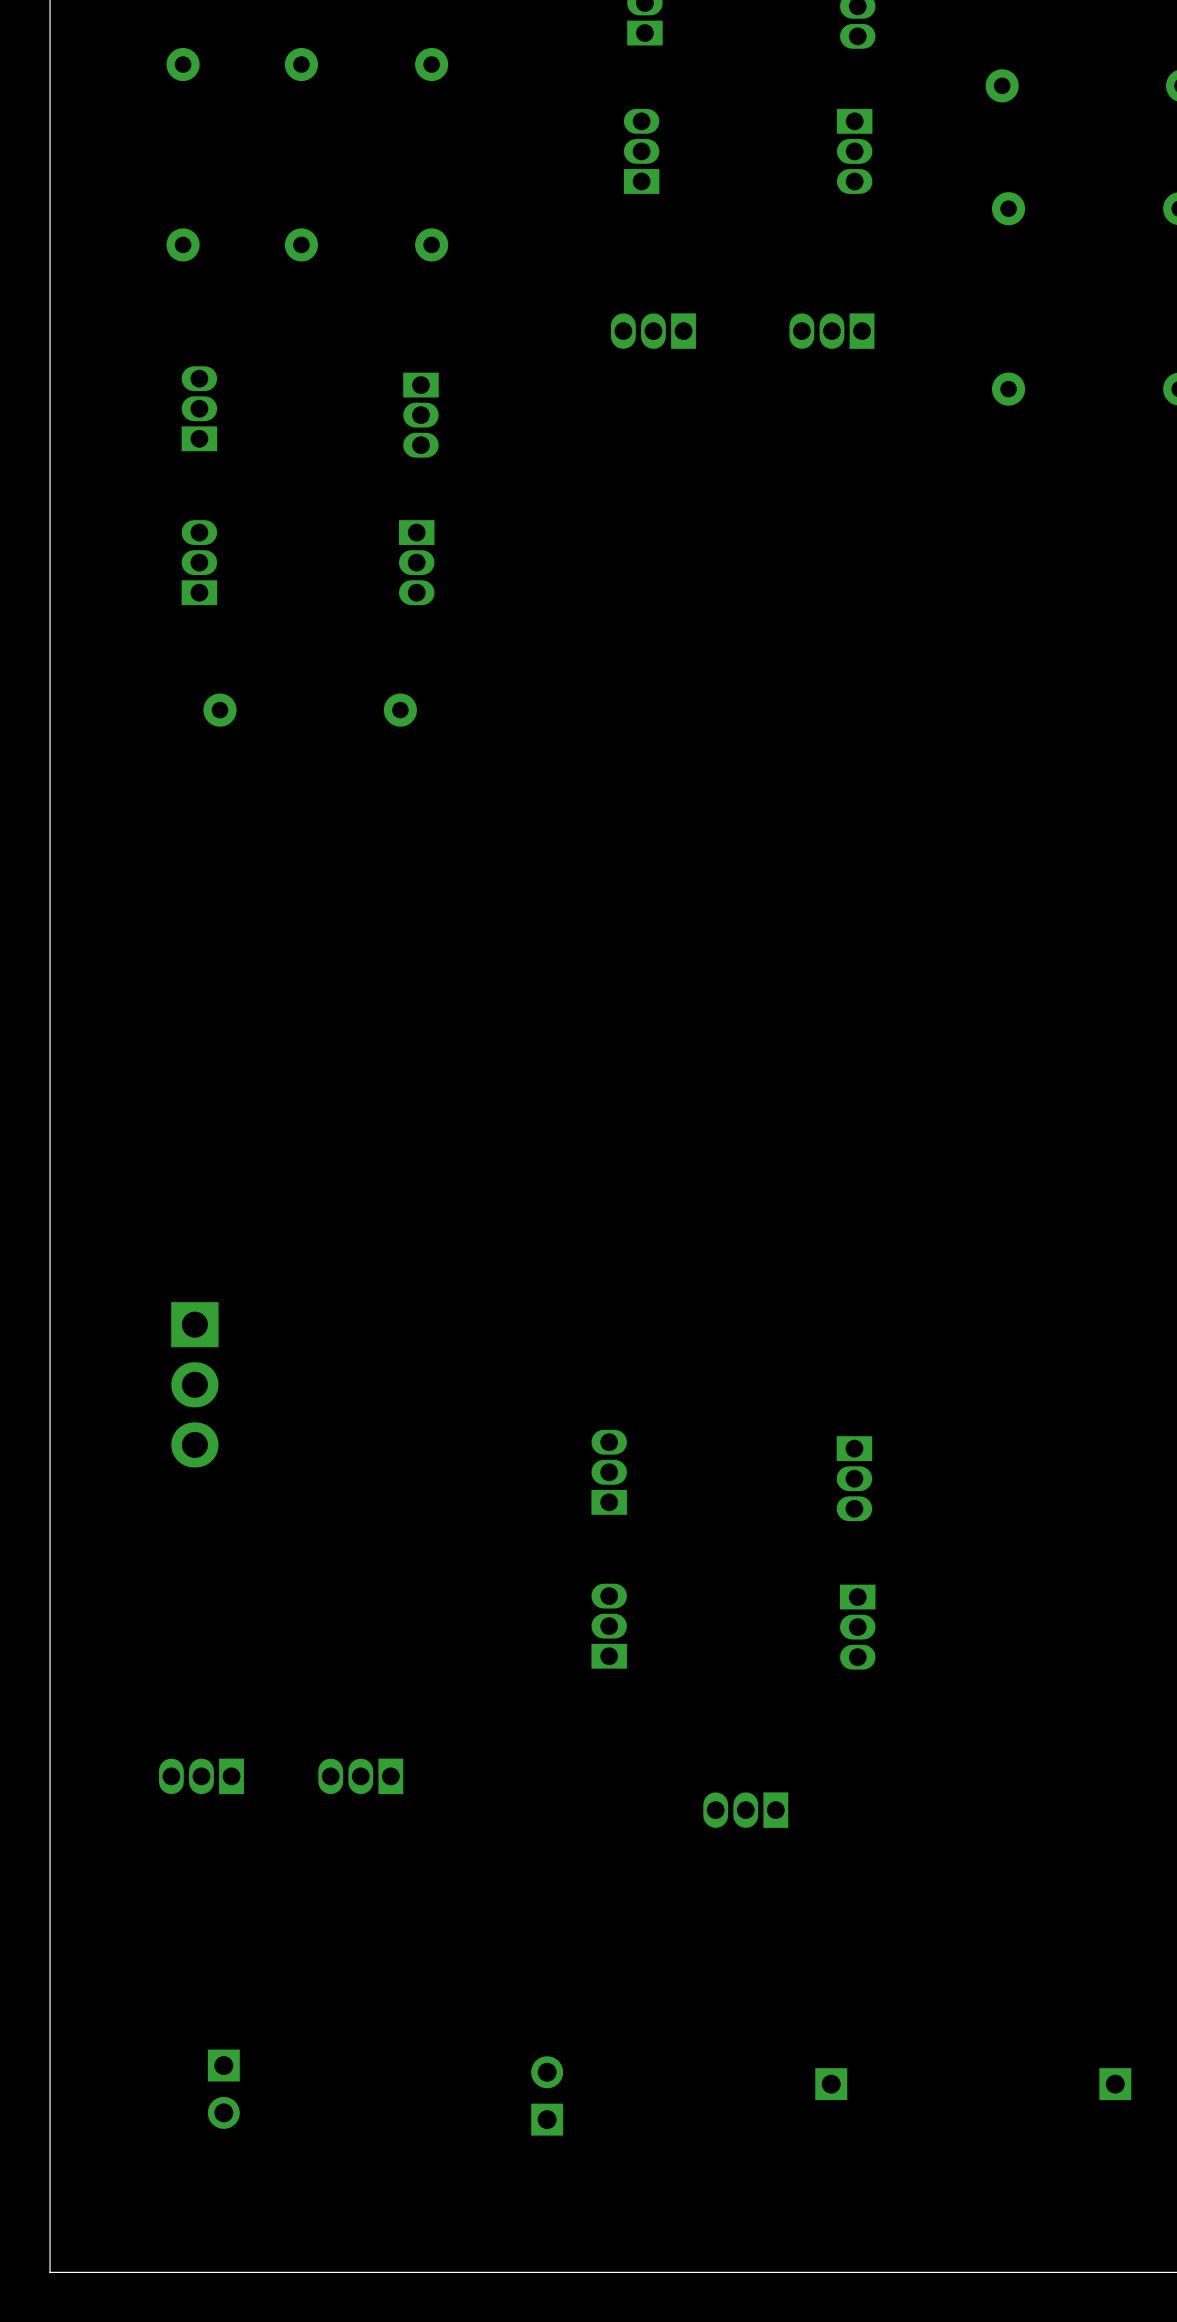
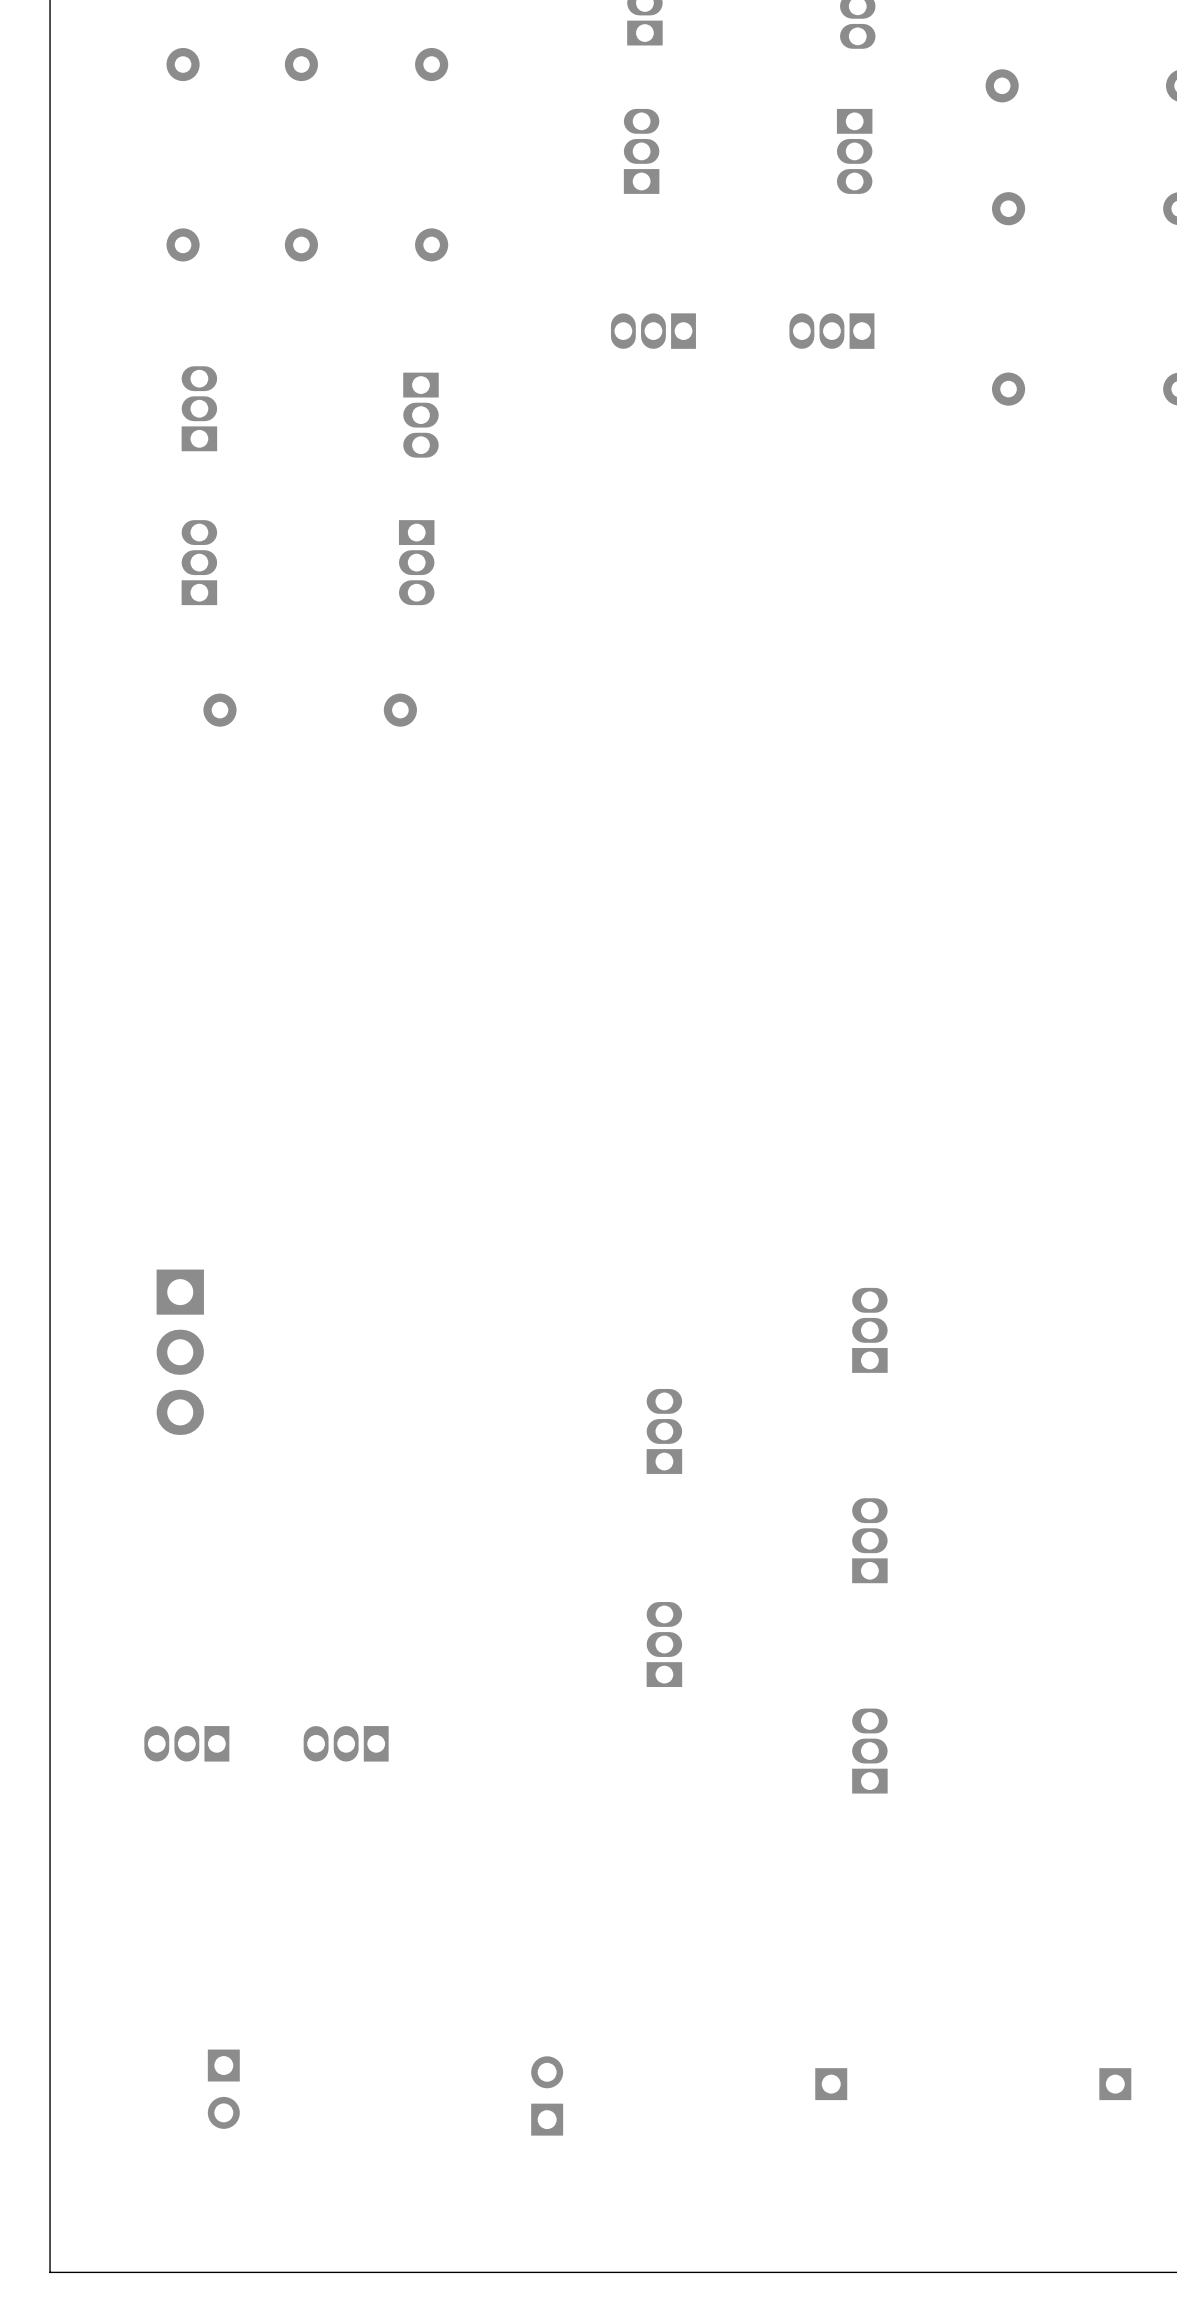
part: none -> (869, 1330)
part position: (194, 1384) -> (180, 1352)
part position: (609, 1472) -> (664, 1431)
part: (854, 1478) -> none
part: none -> (869, 1540)
part position: (609, 1626) -> (664, 1644)
part: (857, 1627) -> none
part: none -> (869, 1751)
part position: (201, 1776) -> (186, 1743)
part position: (360, 1776) -> (346, 1743)
part: (745, 1810) -> none

